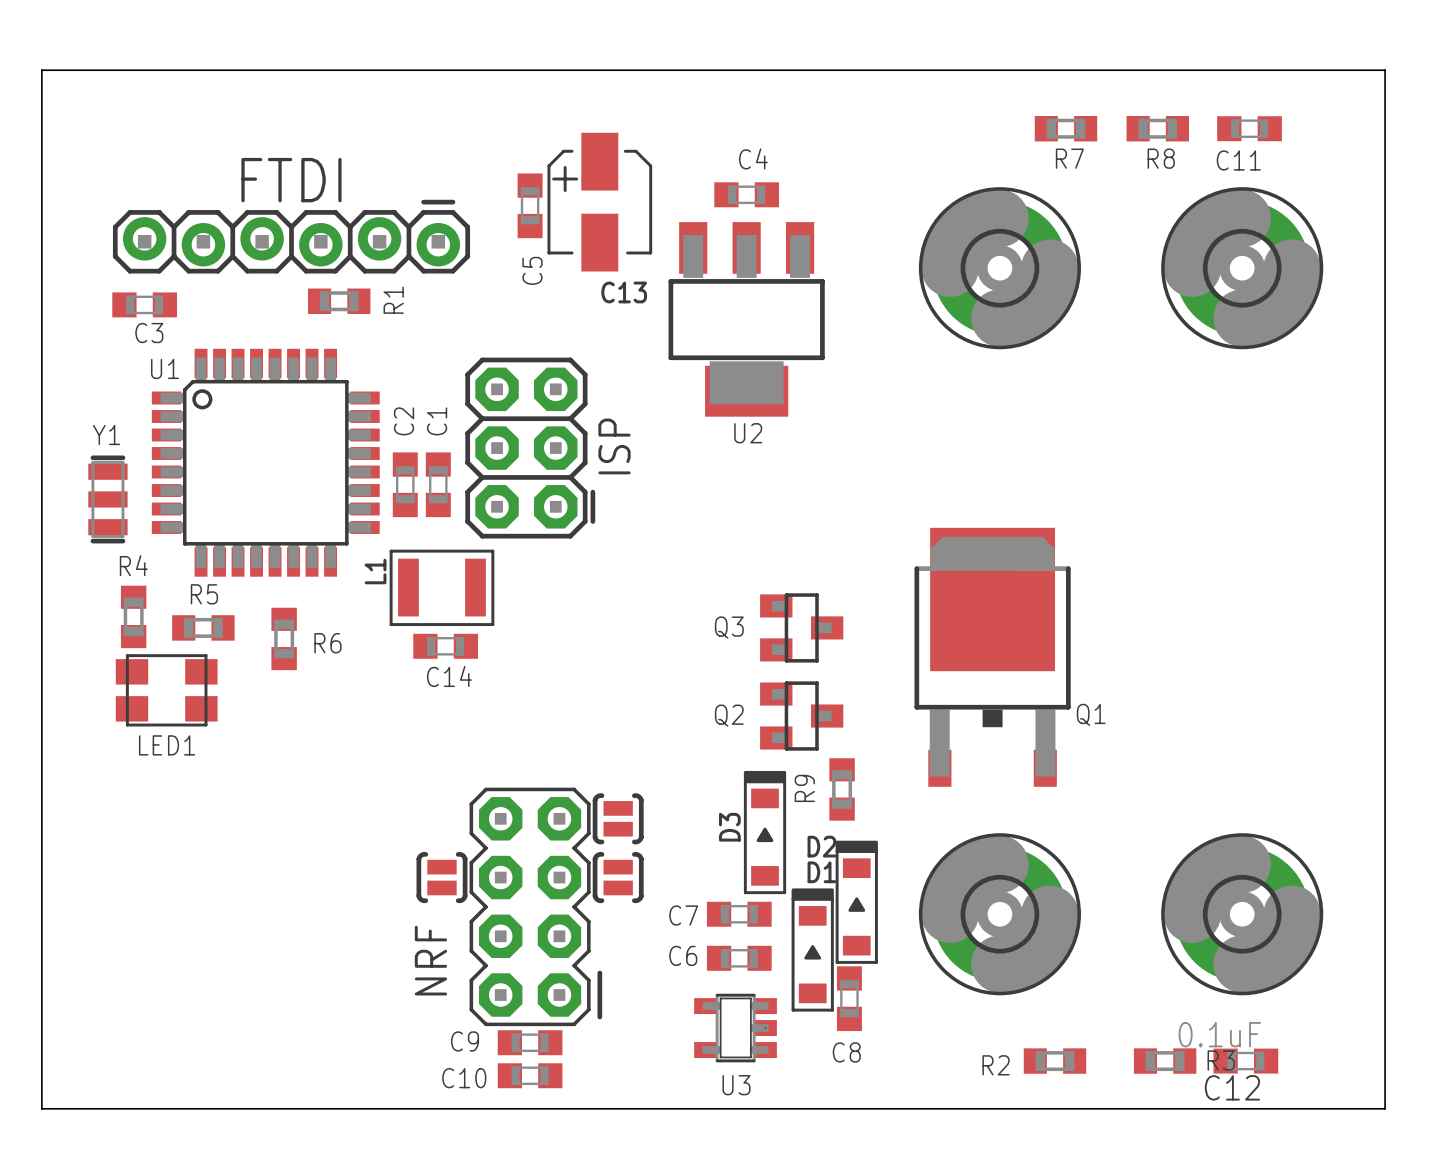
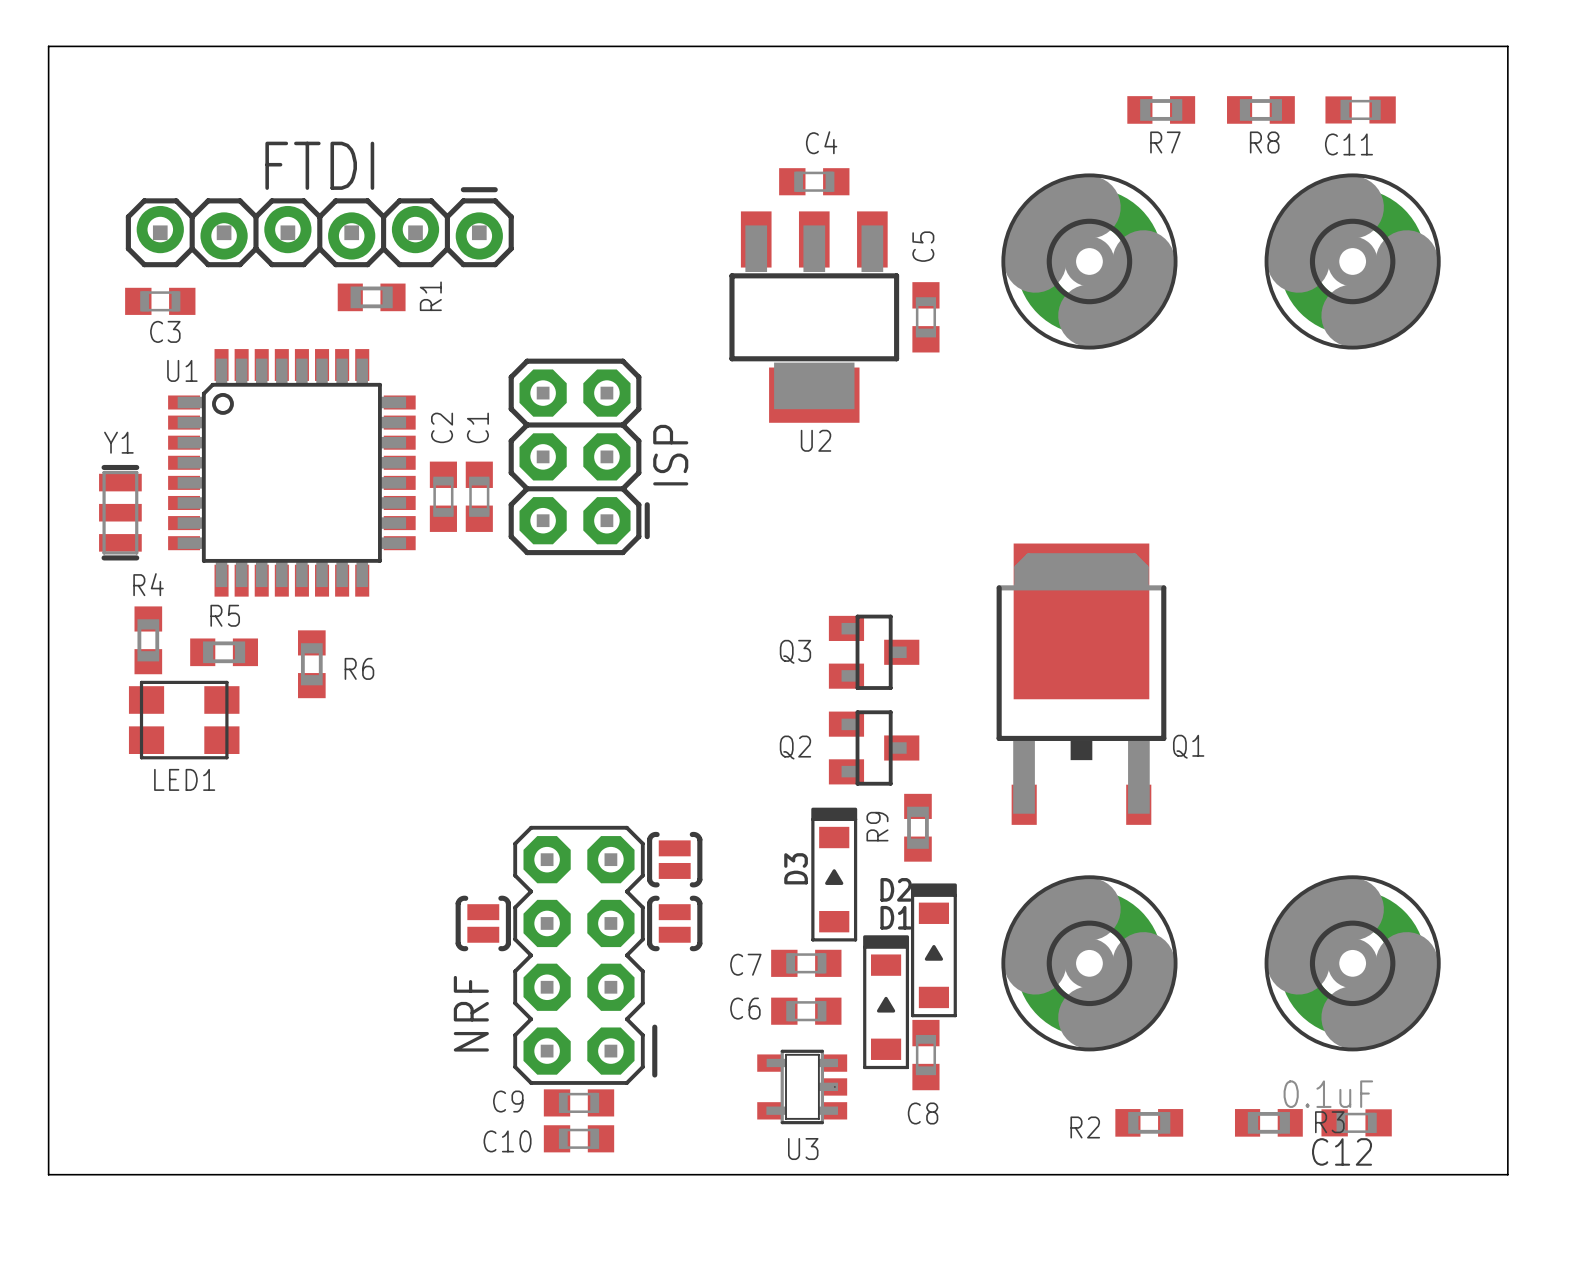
C13: (599, 202) -> none
C5 position: (530, 205) -> (925, 317)
C5 name position: C5 (532, 270) -> C5 (923, 246)
L1: (441, 587) -> none
C14: (445, 646) -> none

